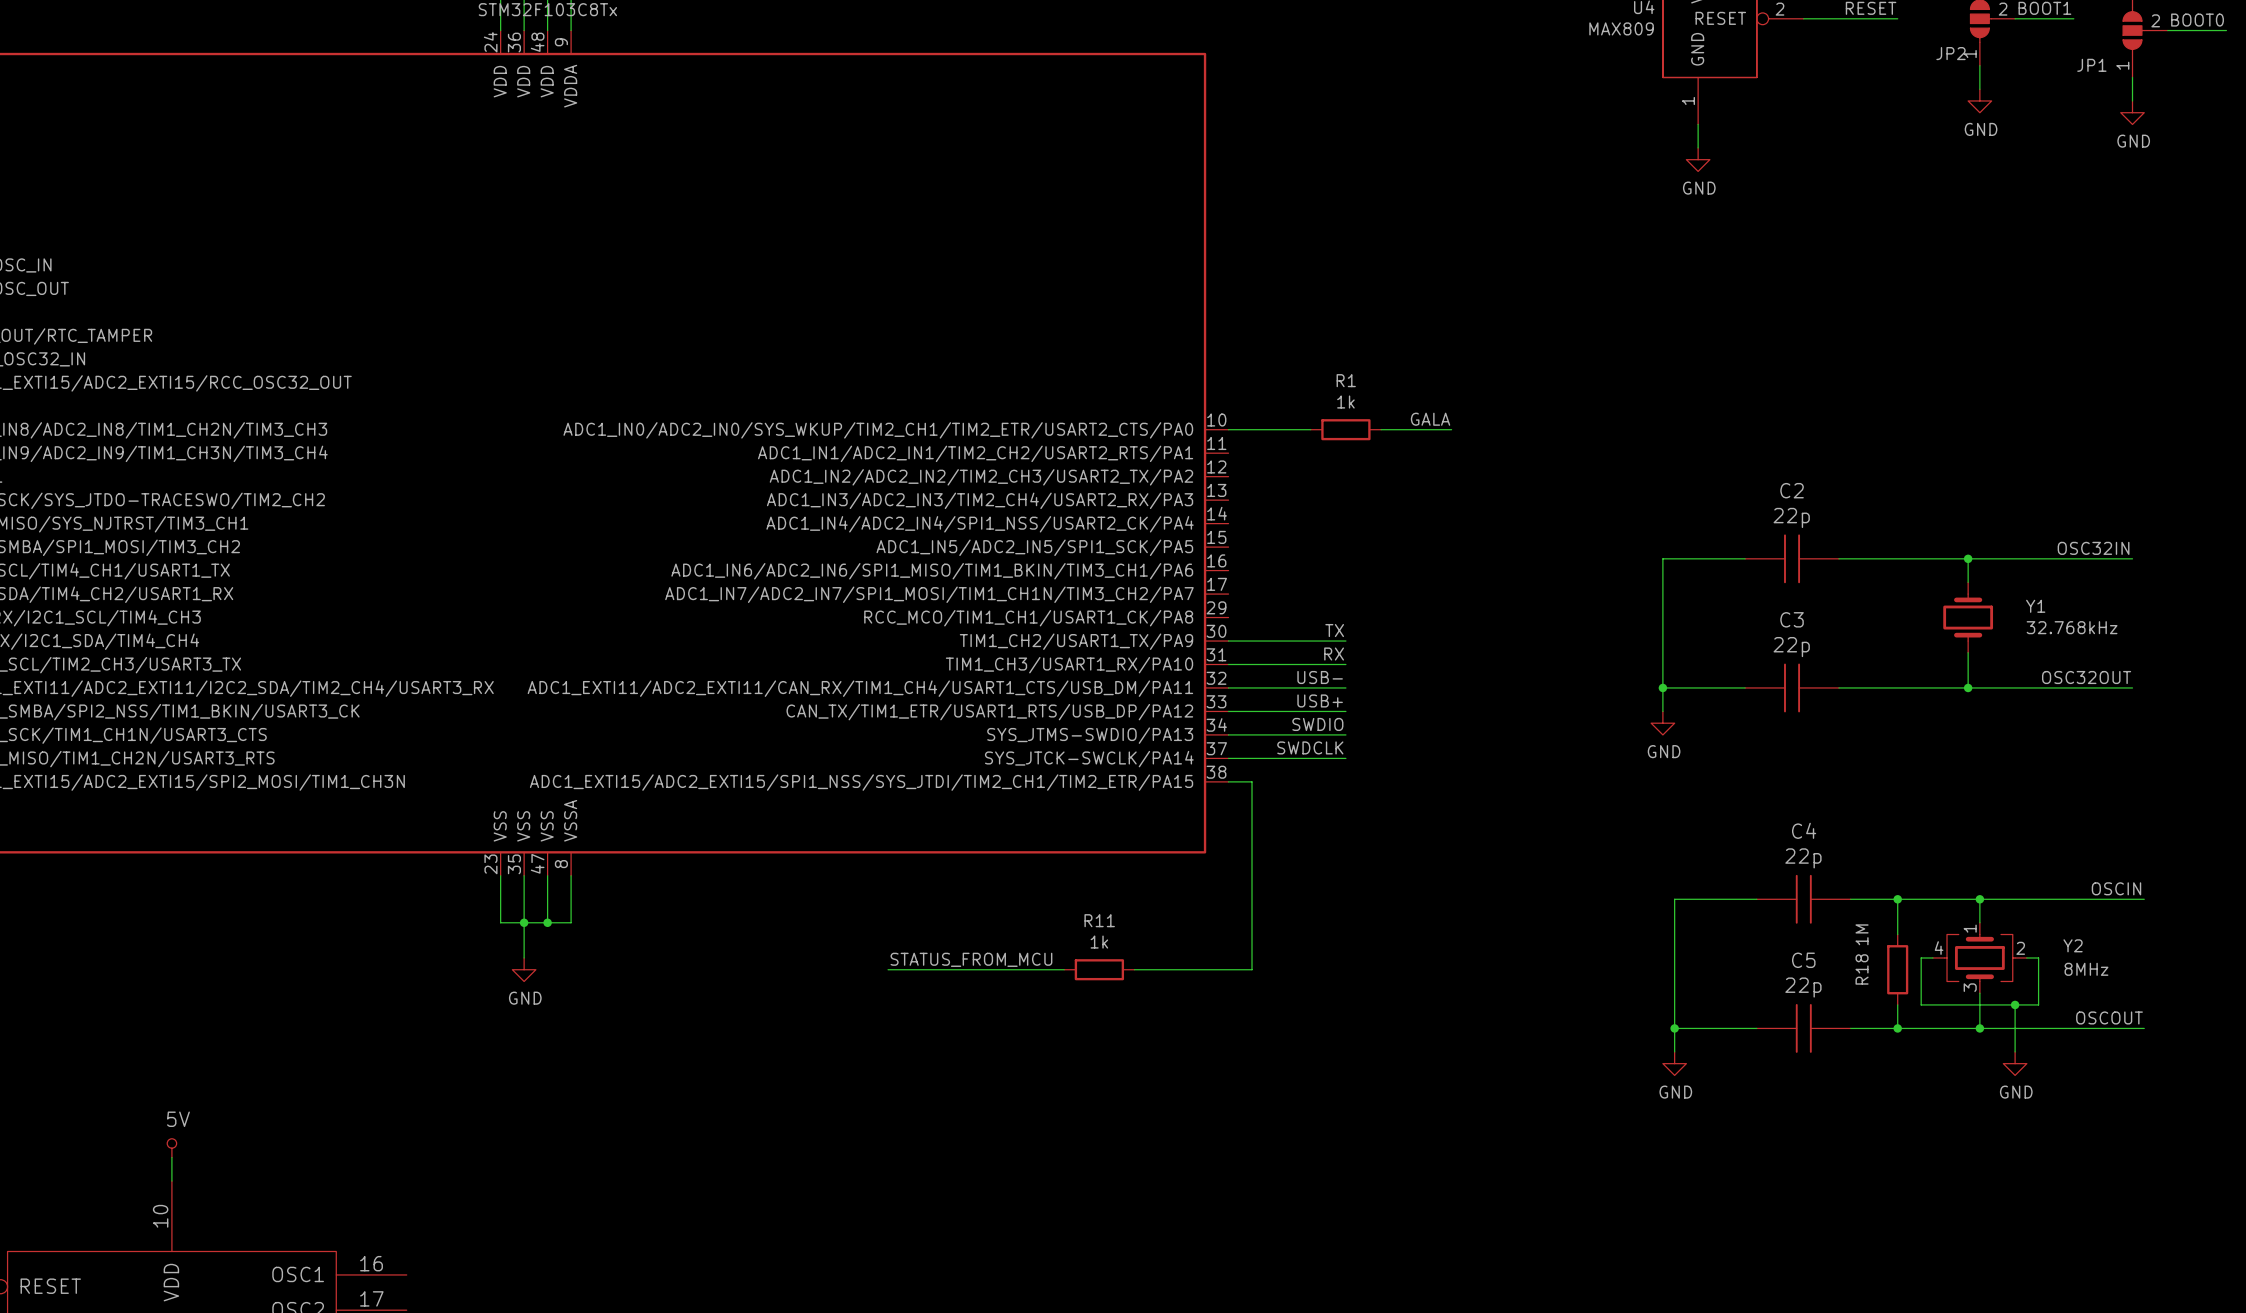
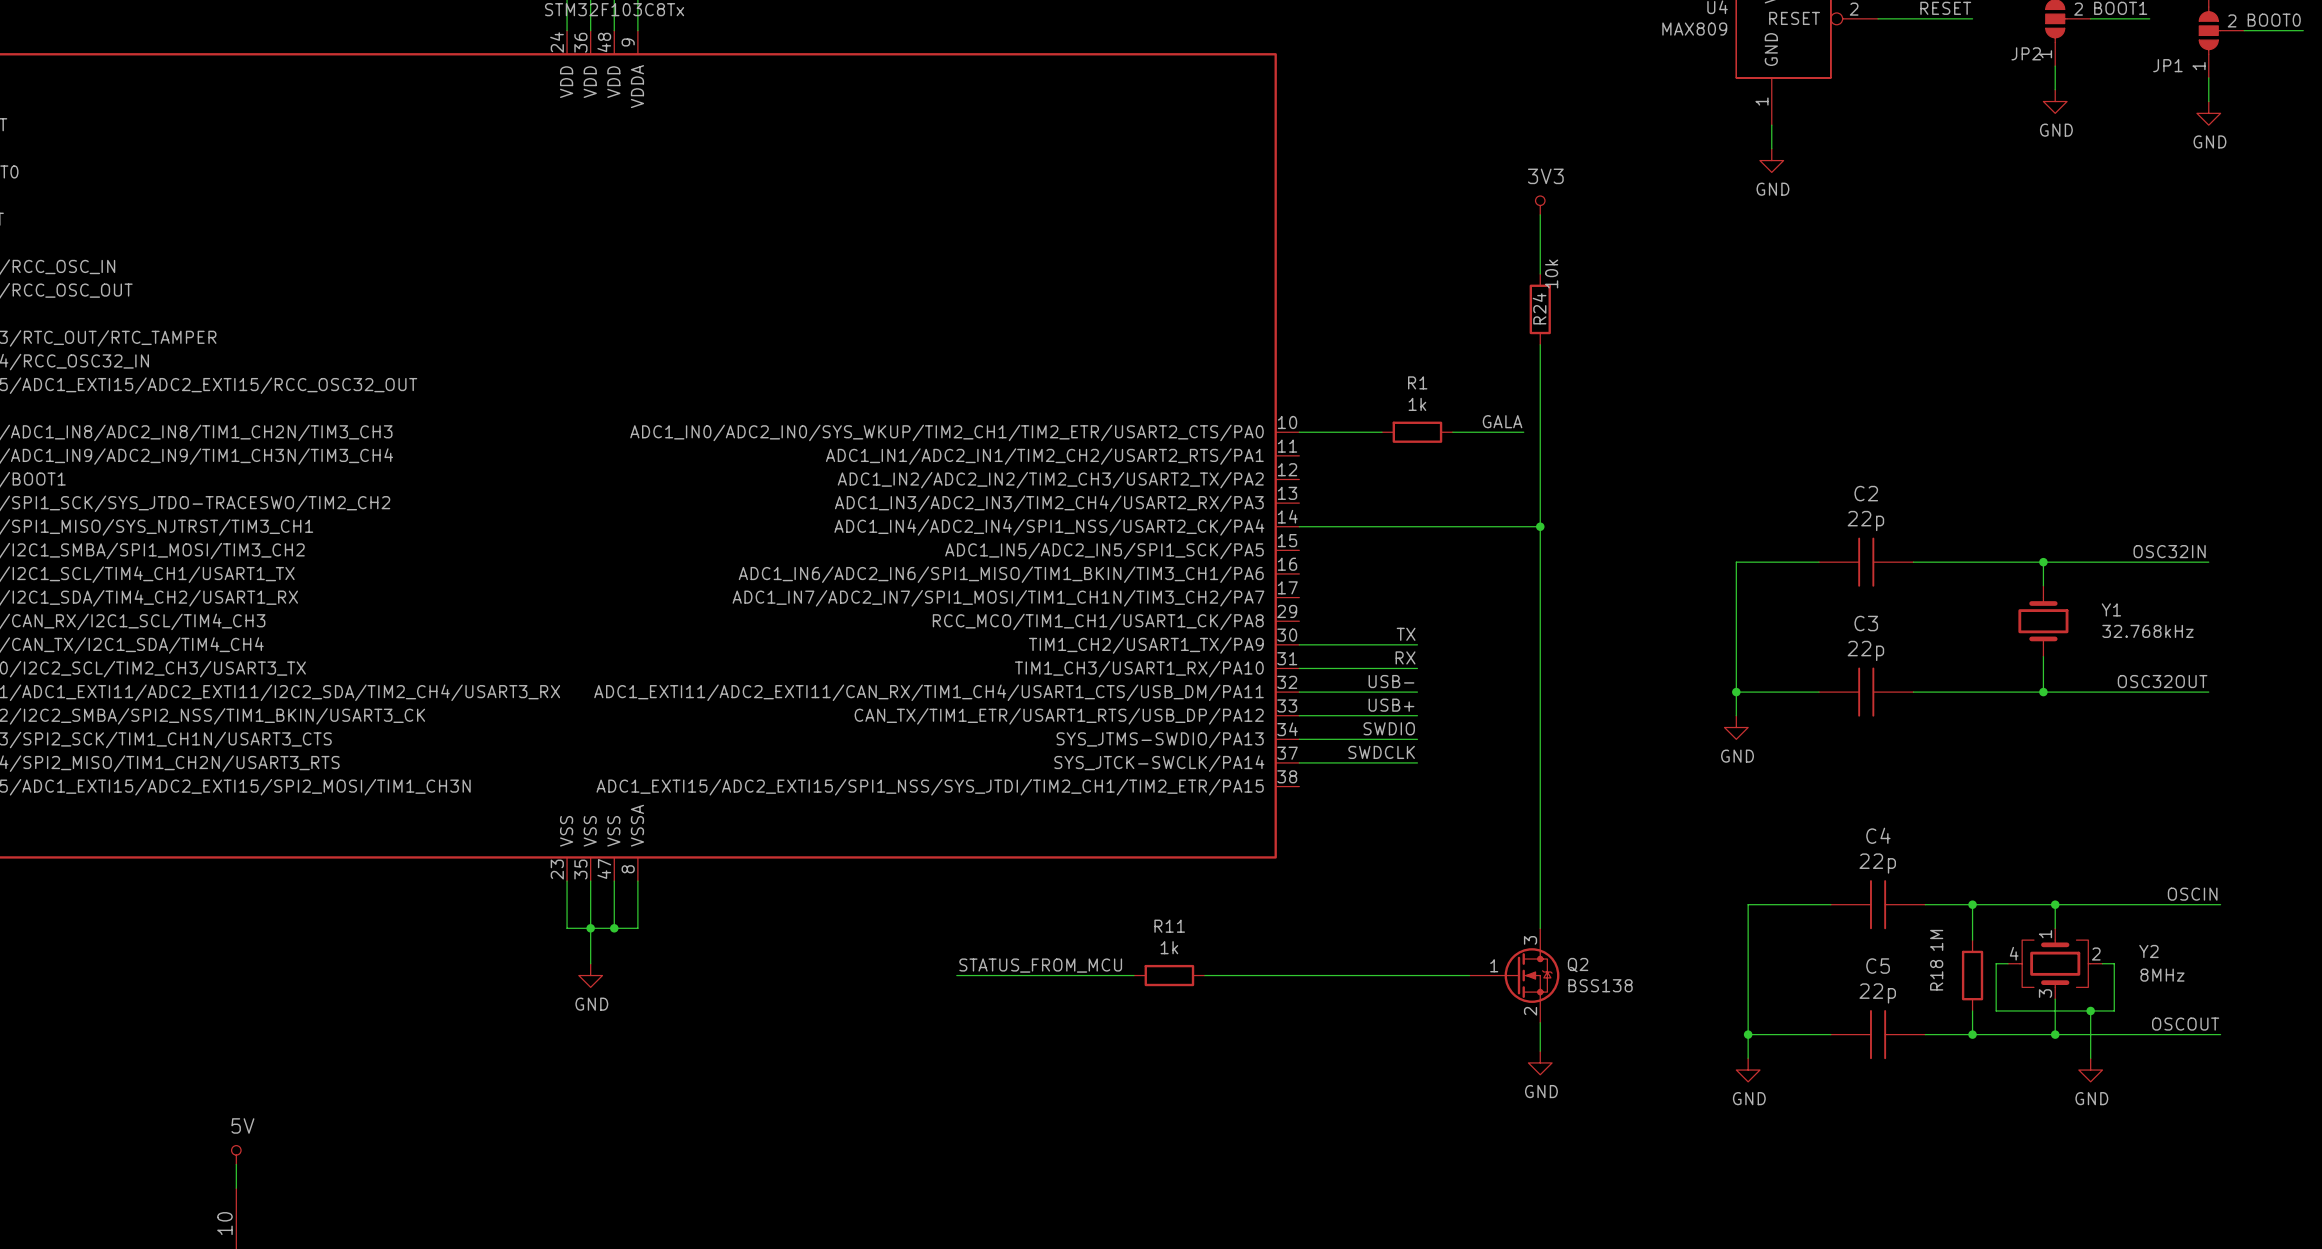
power symbol: none -> 3V3 (1540, 205)
wire: none -> (1540, 214) (1540, 273)
R24: none -> 10k (1540, 309)
wire: none -> (1540, 344) (1540, 928)
wire: none -> (1299, 526) (1540, 526)
junction: none -> (1540, 526)
wire: (1228, 781) (1252, 781) (1252, 969) -> (1469, 975) (1322, 975)
Q2: none -> BSS138 (1514, 975)
wire: none -> (1540, 1022) (1540, 1051)
power symbol: none -> GND (1540, 1062)

